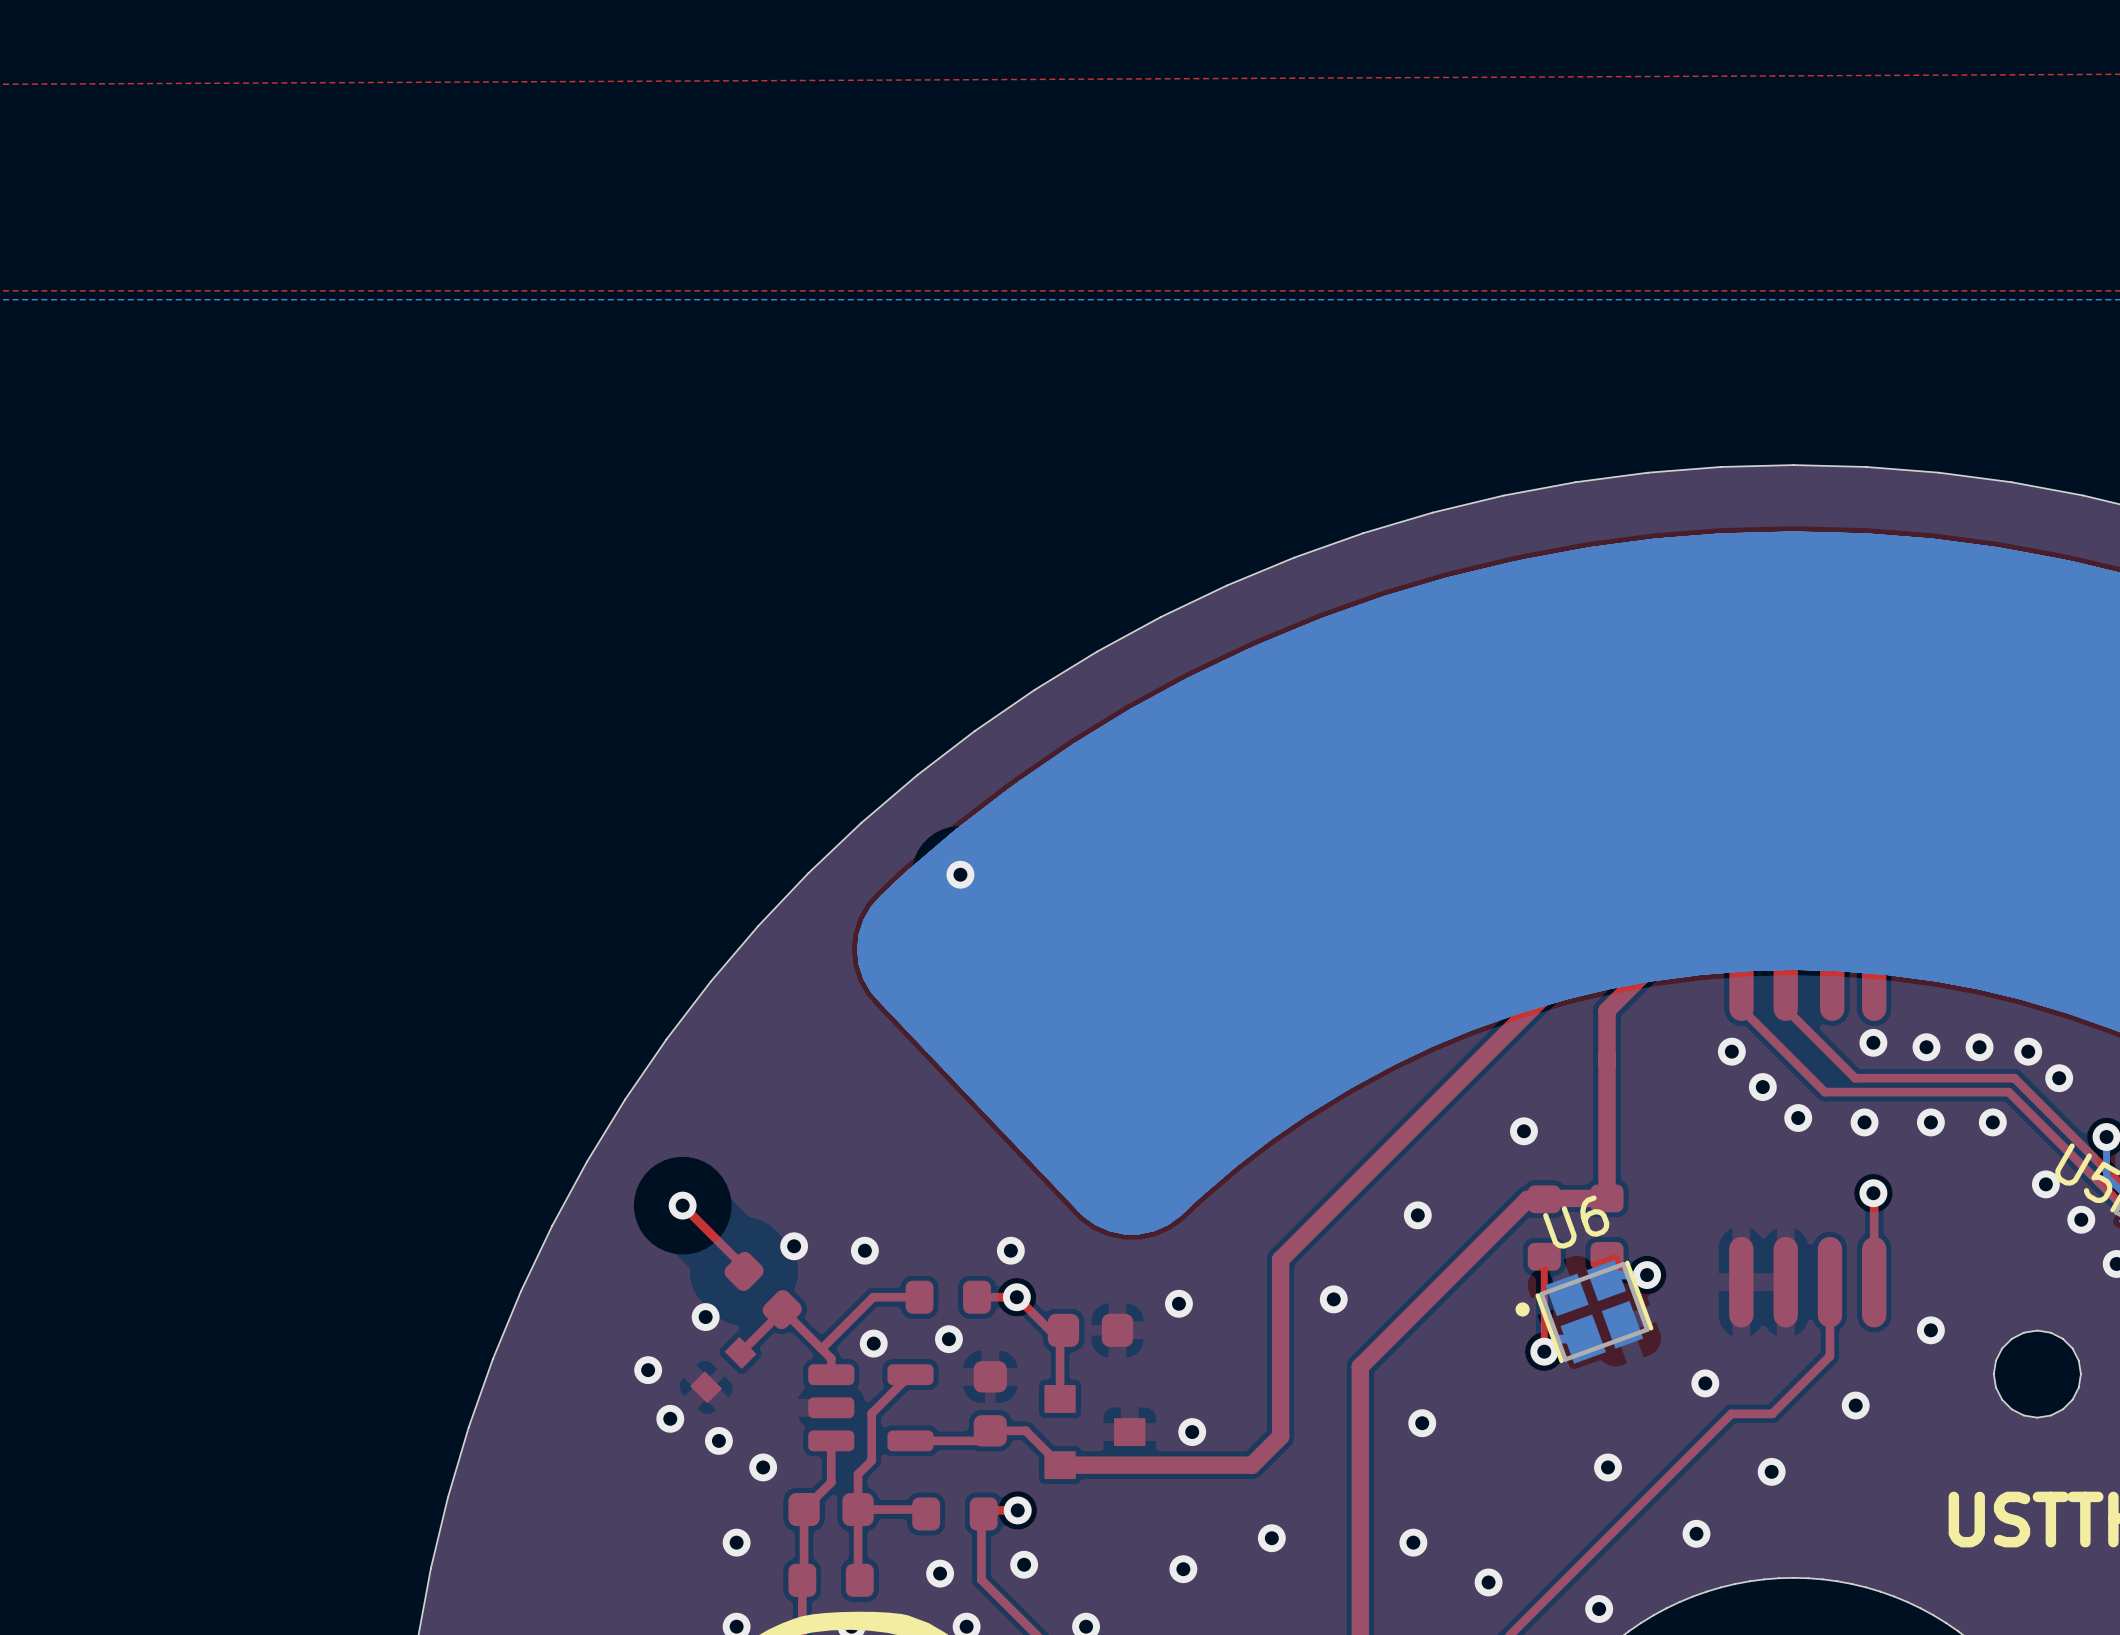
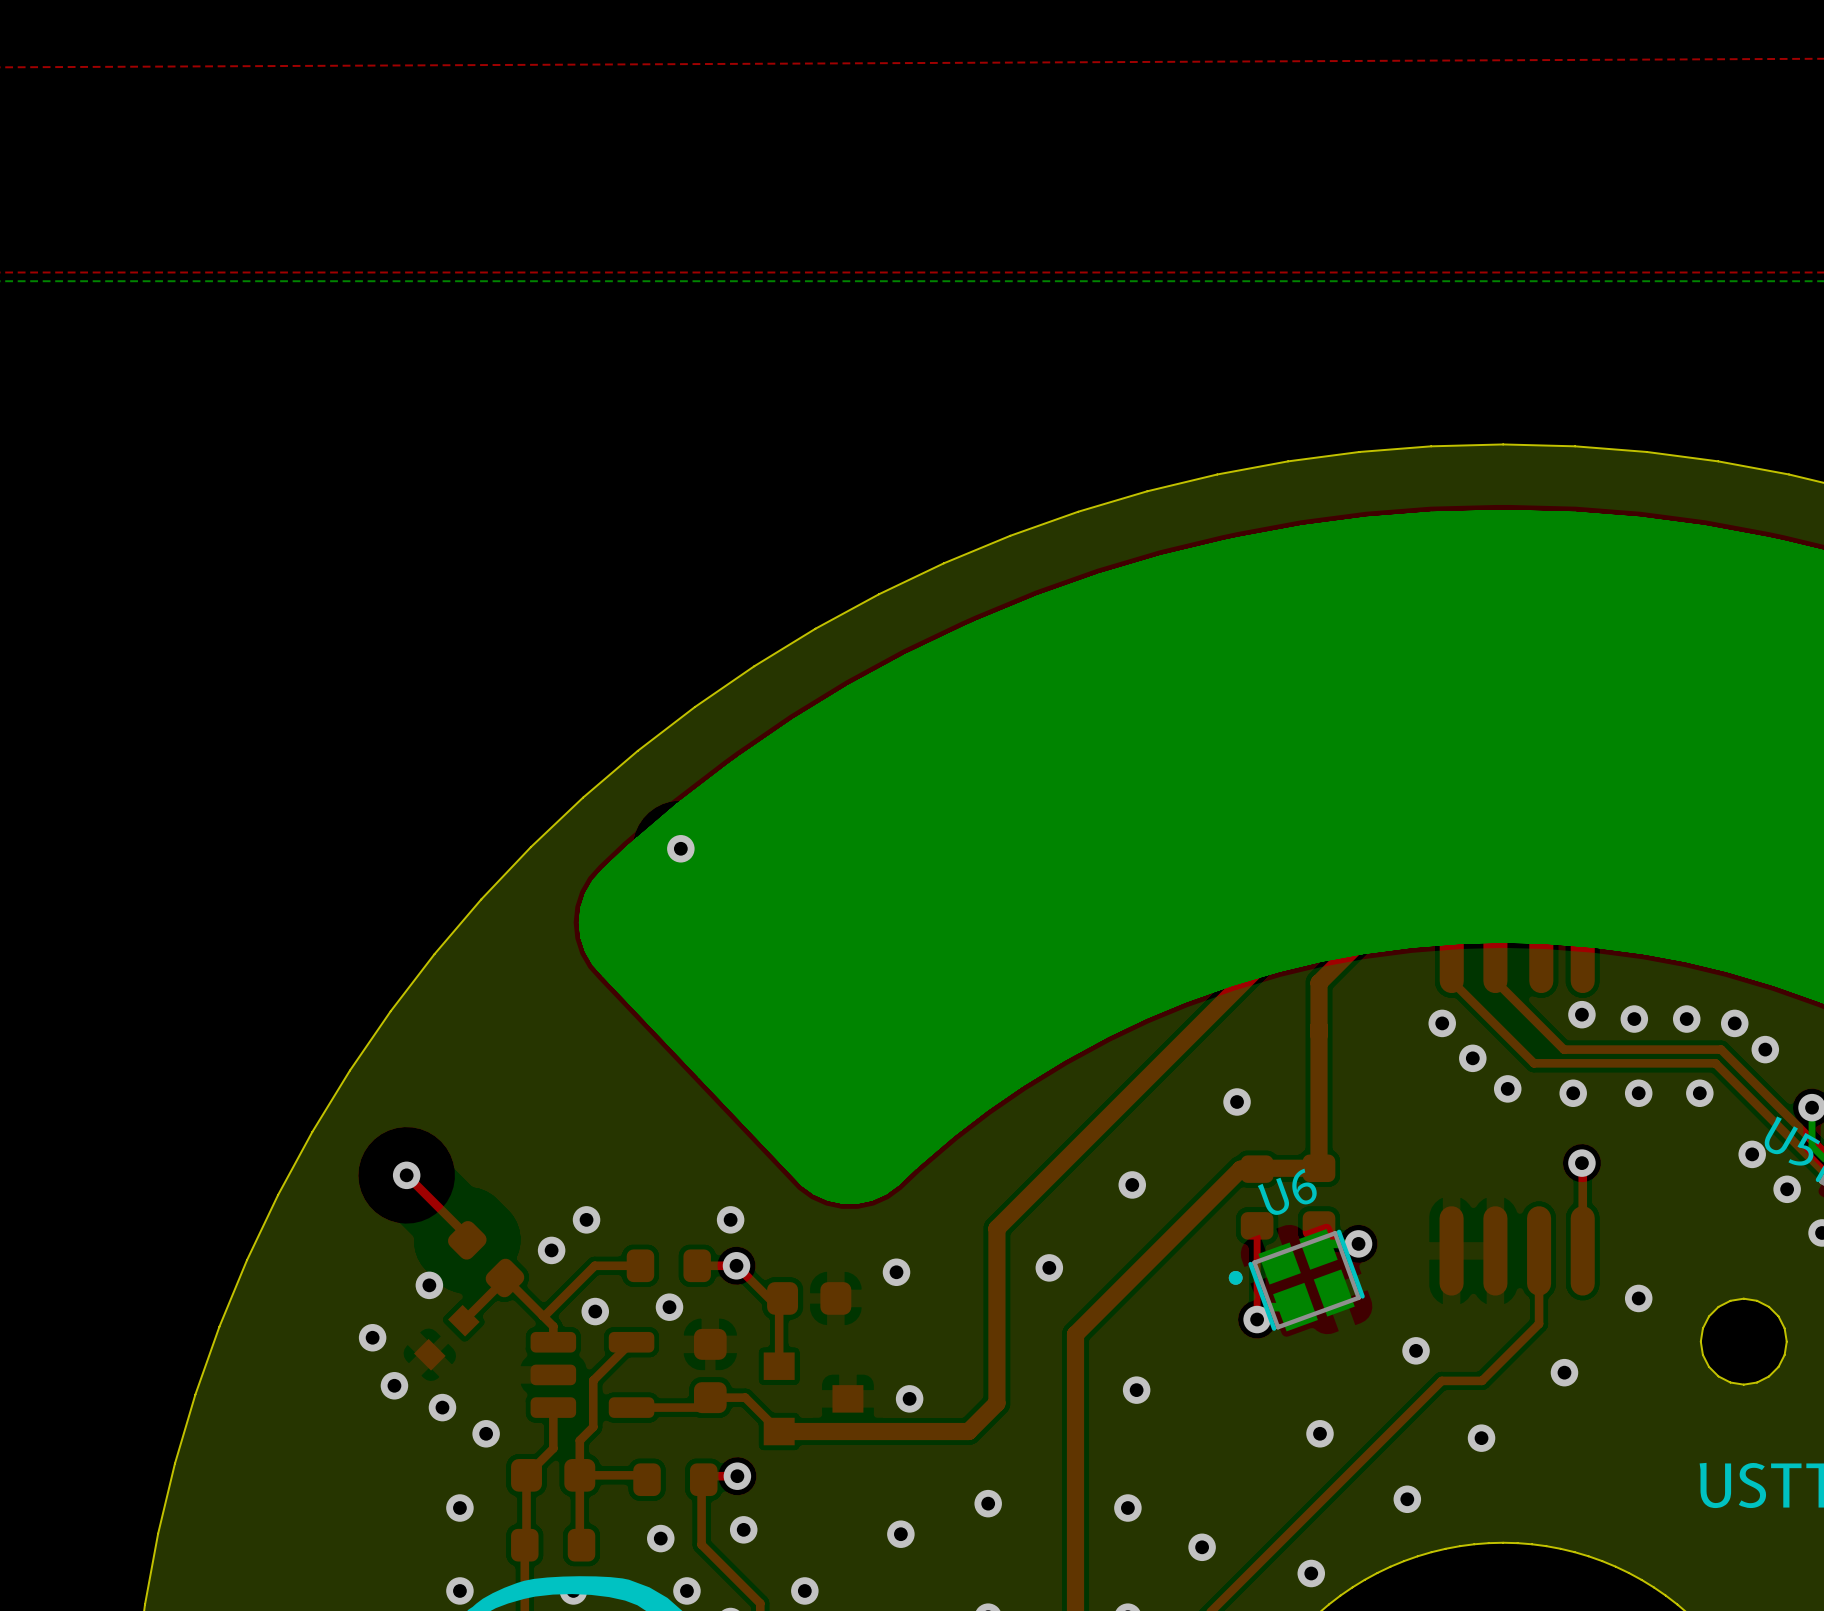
via position: (794, 1246) -> (551, 1250)

